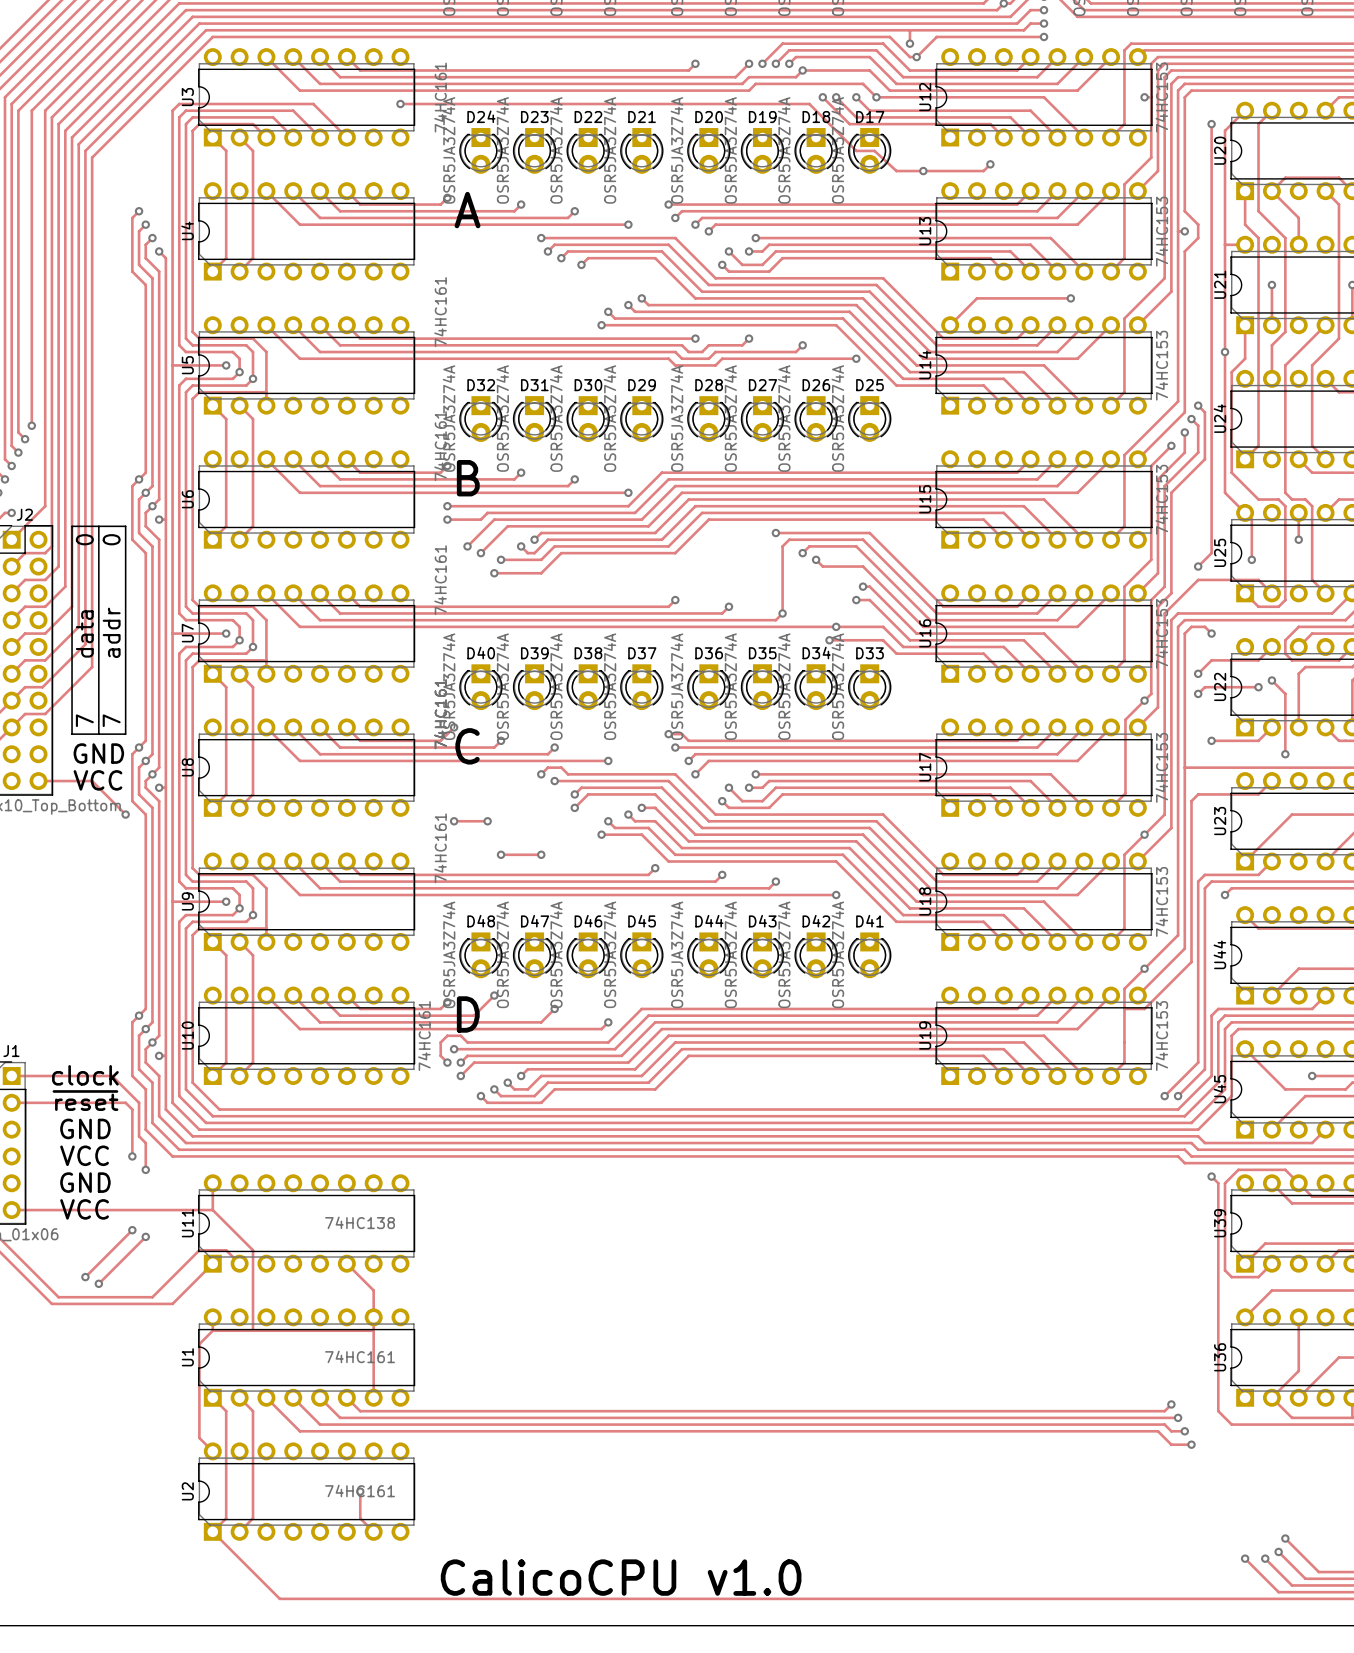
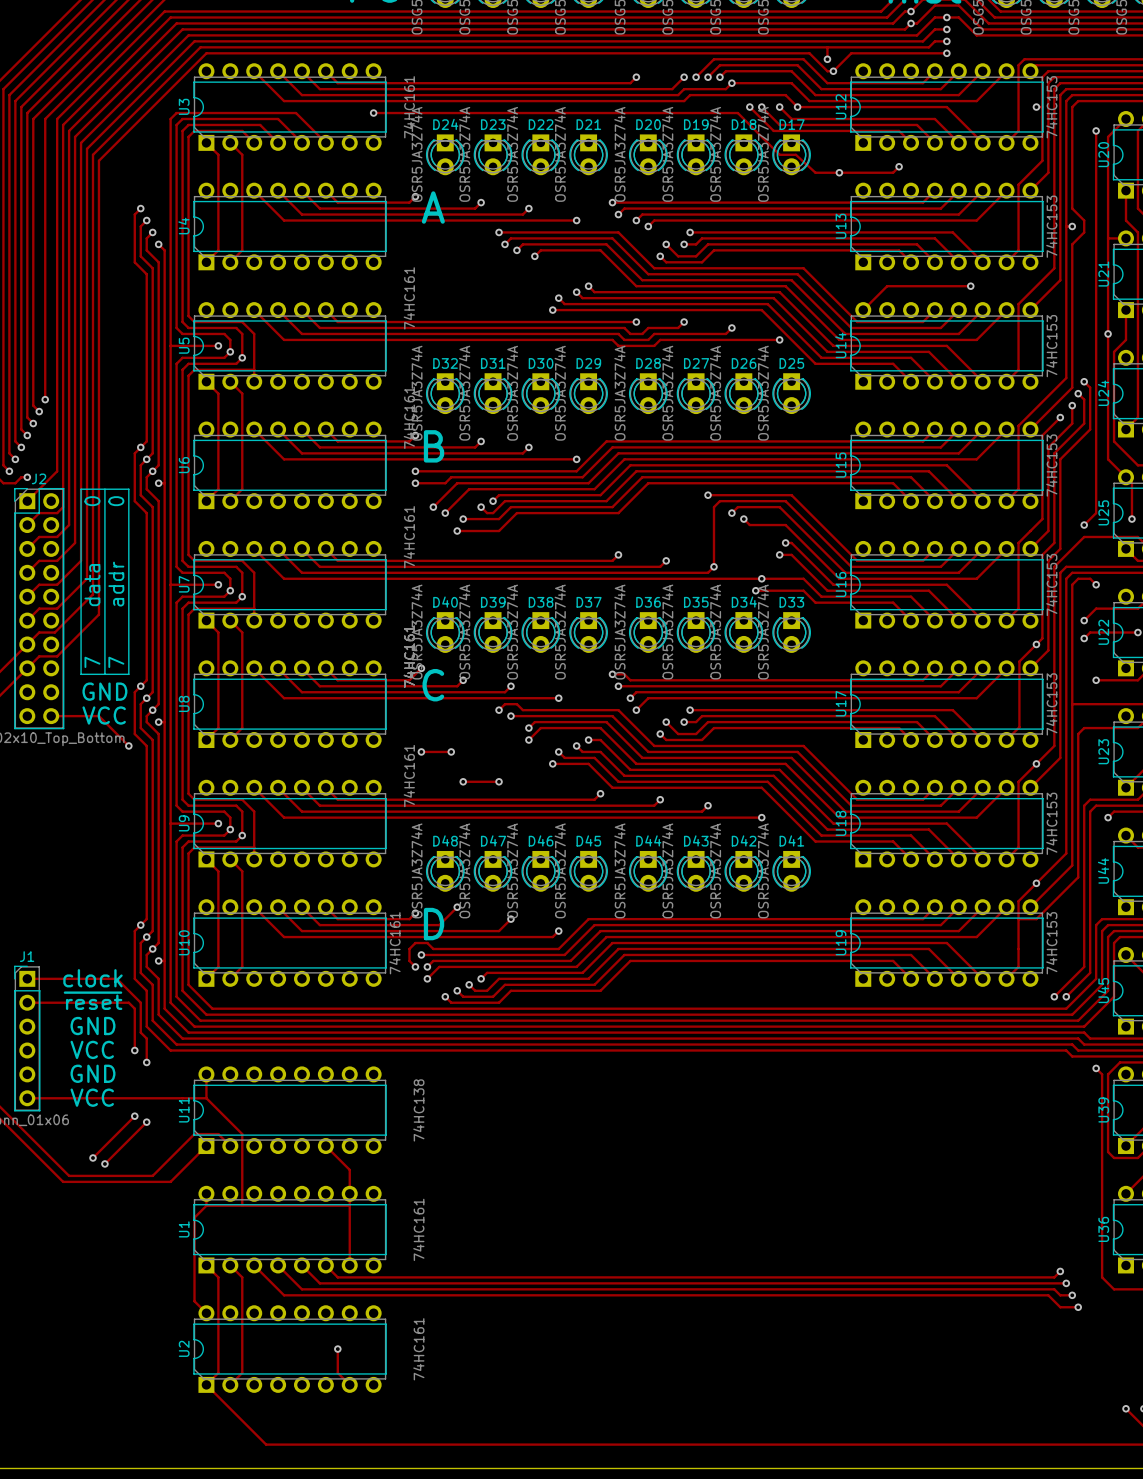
U11 value rotation: 0° (360, 1222) -> 90° counterclockwise (418, 1110)
U11 value position: 74HC138 (360, 1222) -> 74HC138 (418, 1110)
U1 value rotation: 0° (360, 1356) -> 90° counterclockwise (418, 1229)
U1 value position: 74HC161 (360, 1356) -> 74HC161 (418, 1229)
U2 value rotation: 0° (360, 1490) -> 90° counterclockwise (418, 1349)
U2 value position: 74HC161 (360, 1490) -> 74HC161 (418, 1349)
text: CalicoCPU v1.0 (621, 1577) -> none

